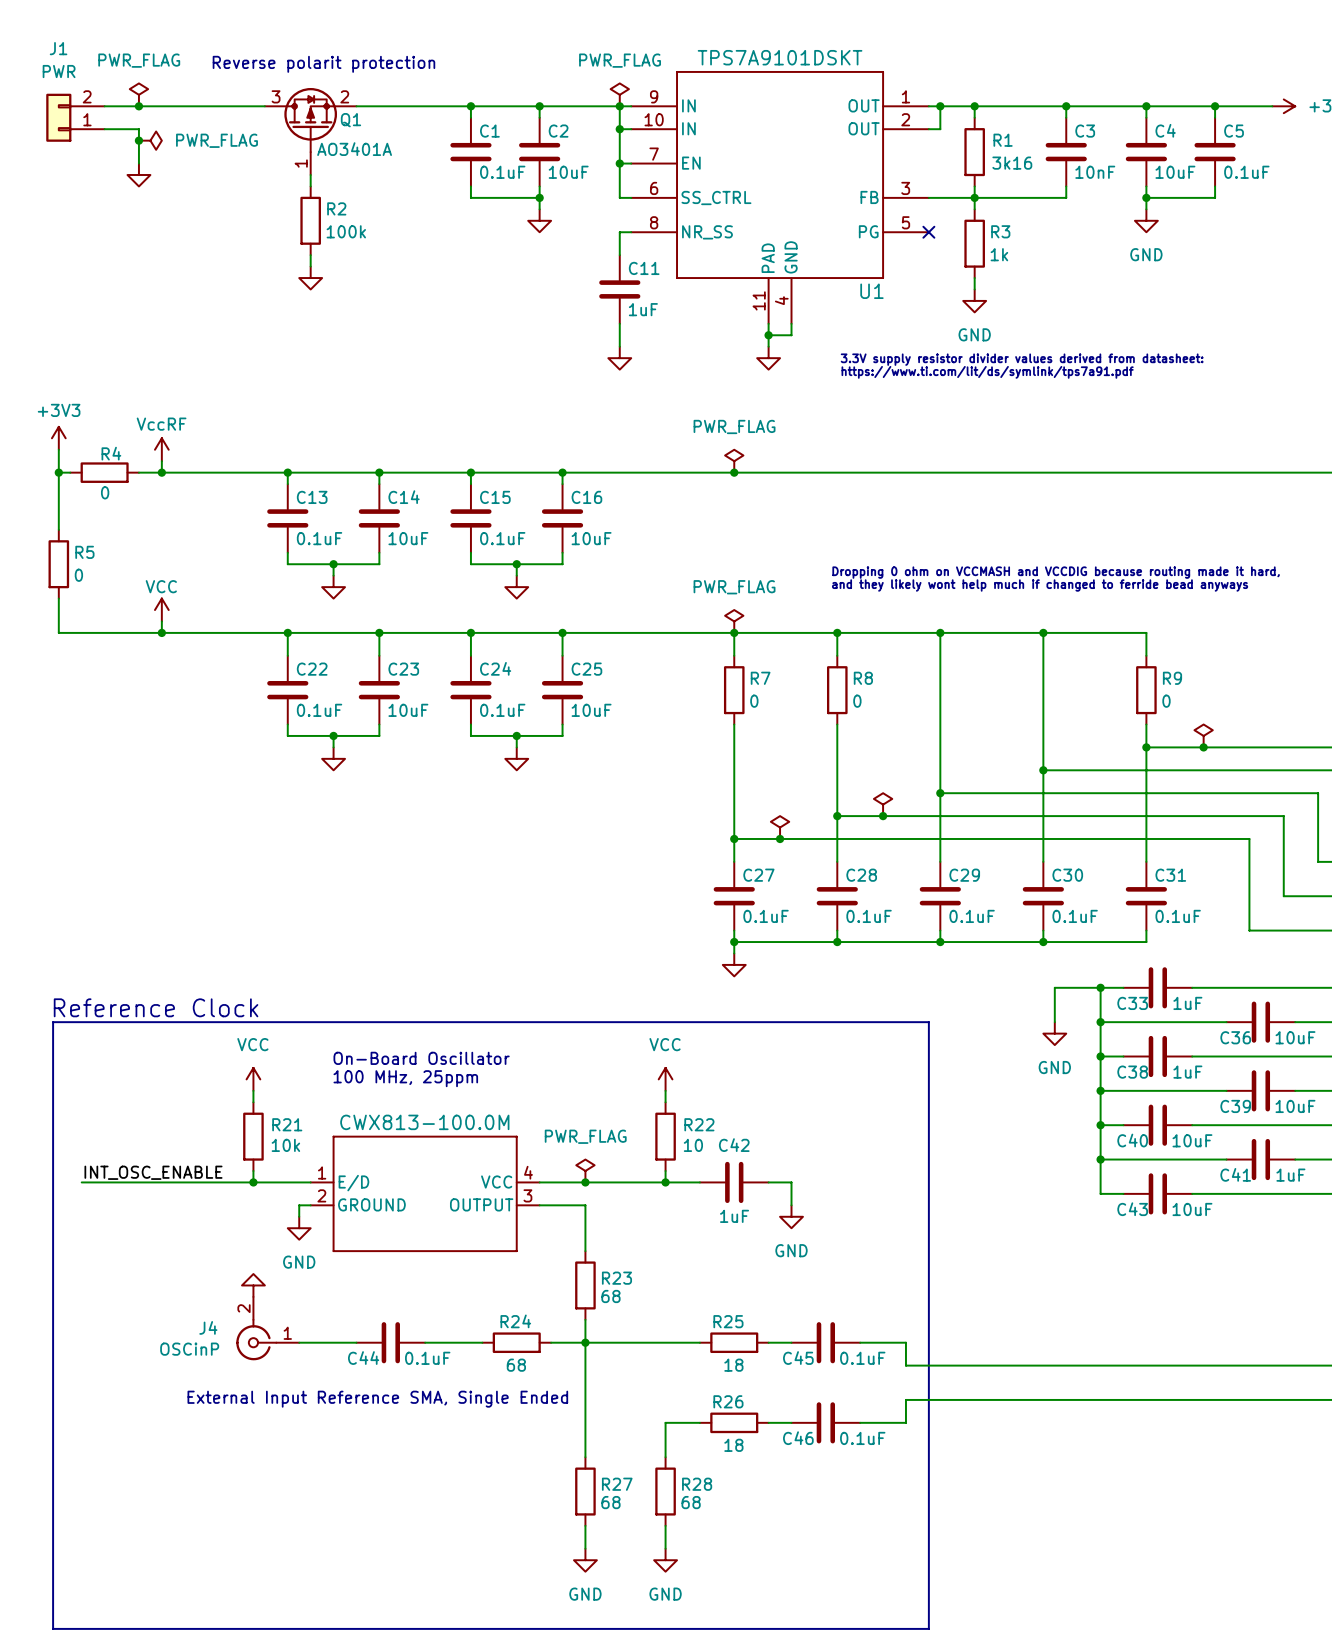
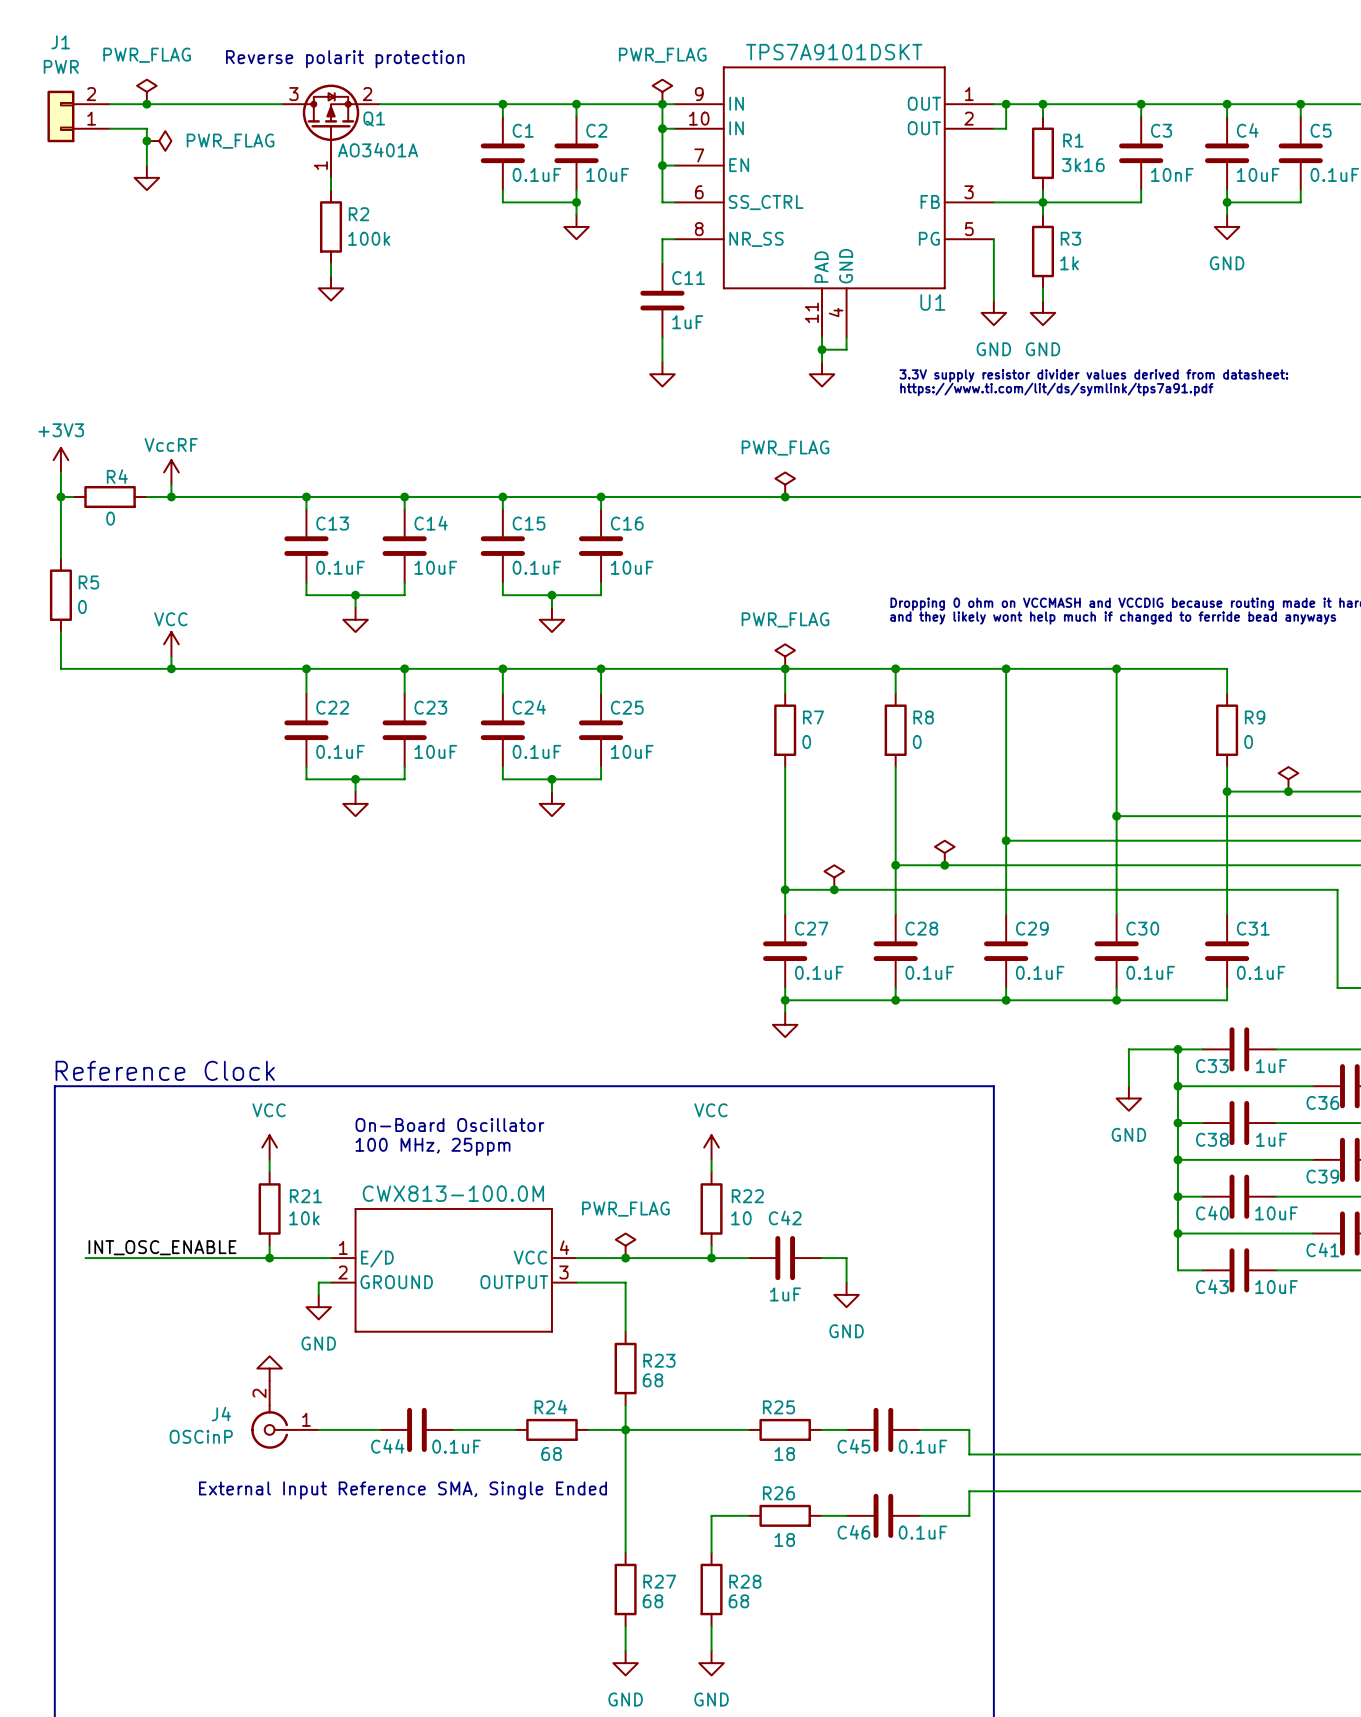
wire: none -> (993, 239) (993, 300)
no-connect mark: (928, 232) -> none
power symbol: none -> GND (993, 312)

